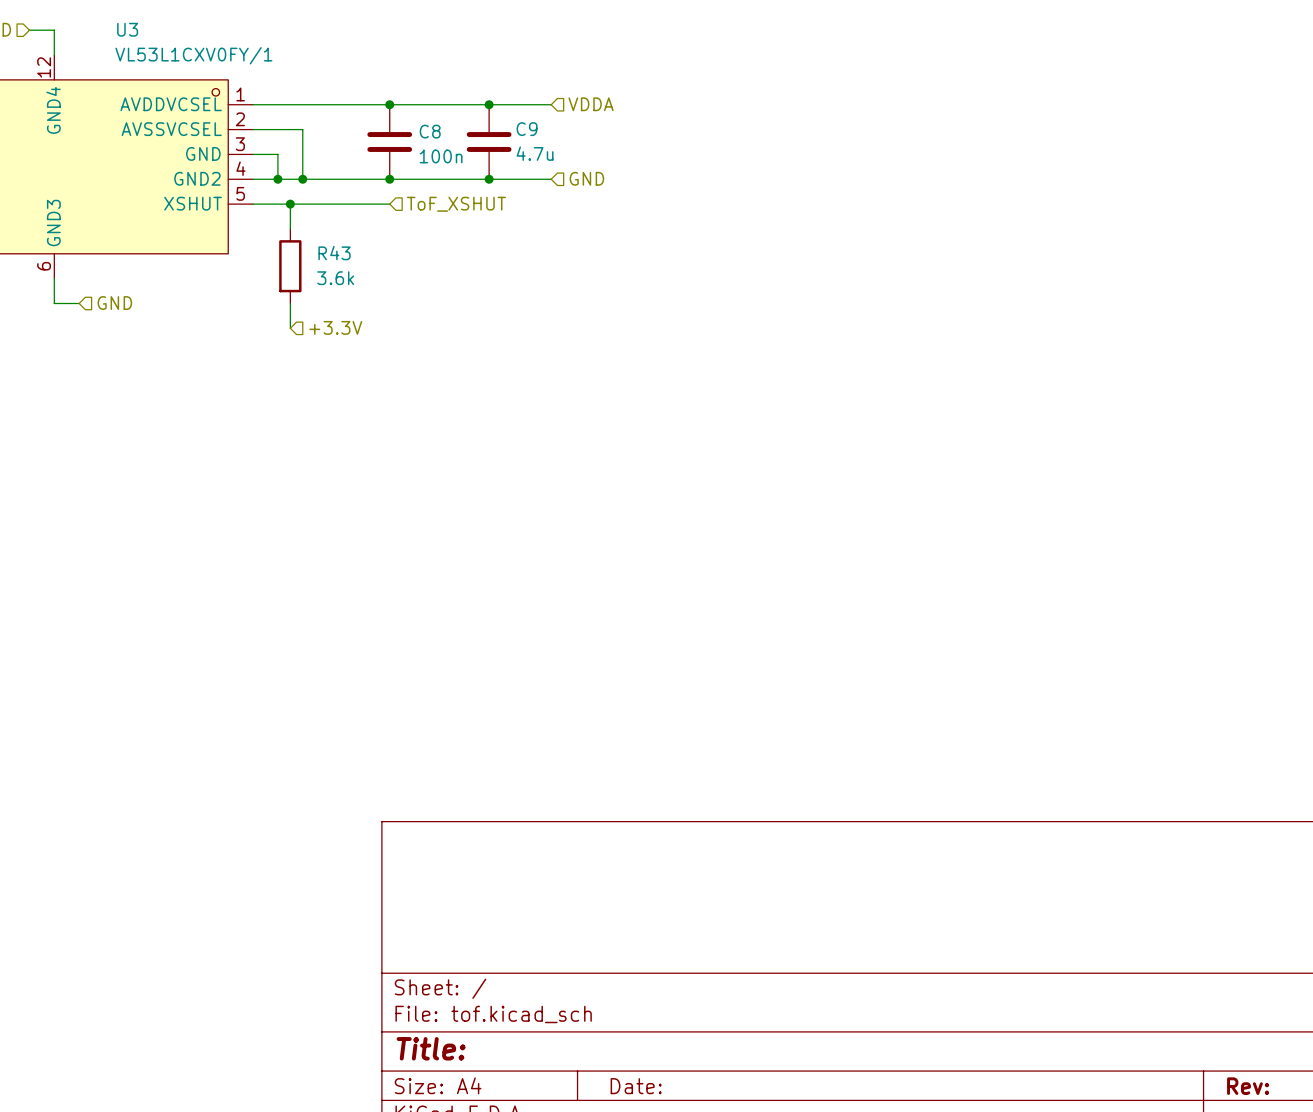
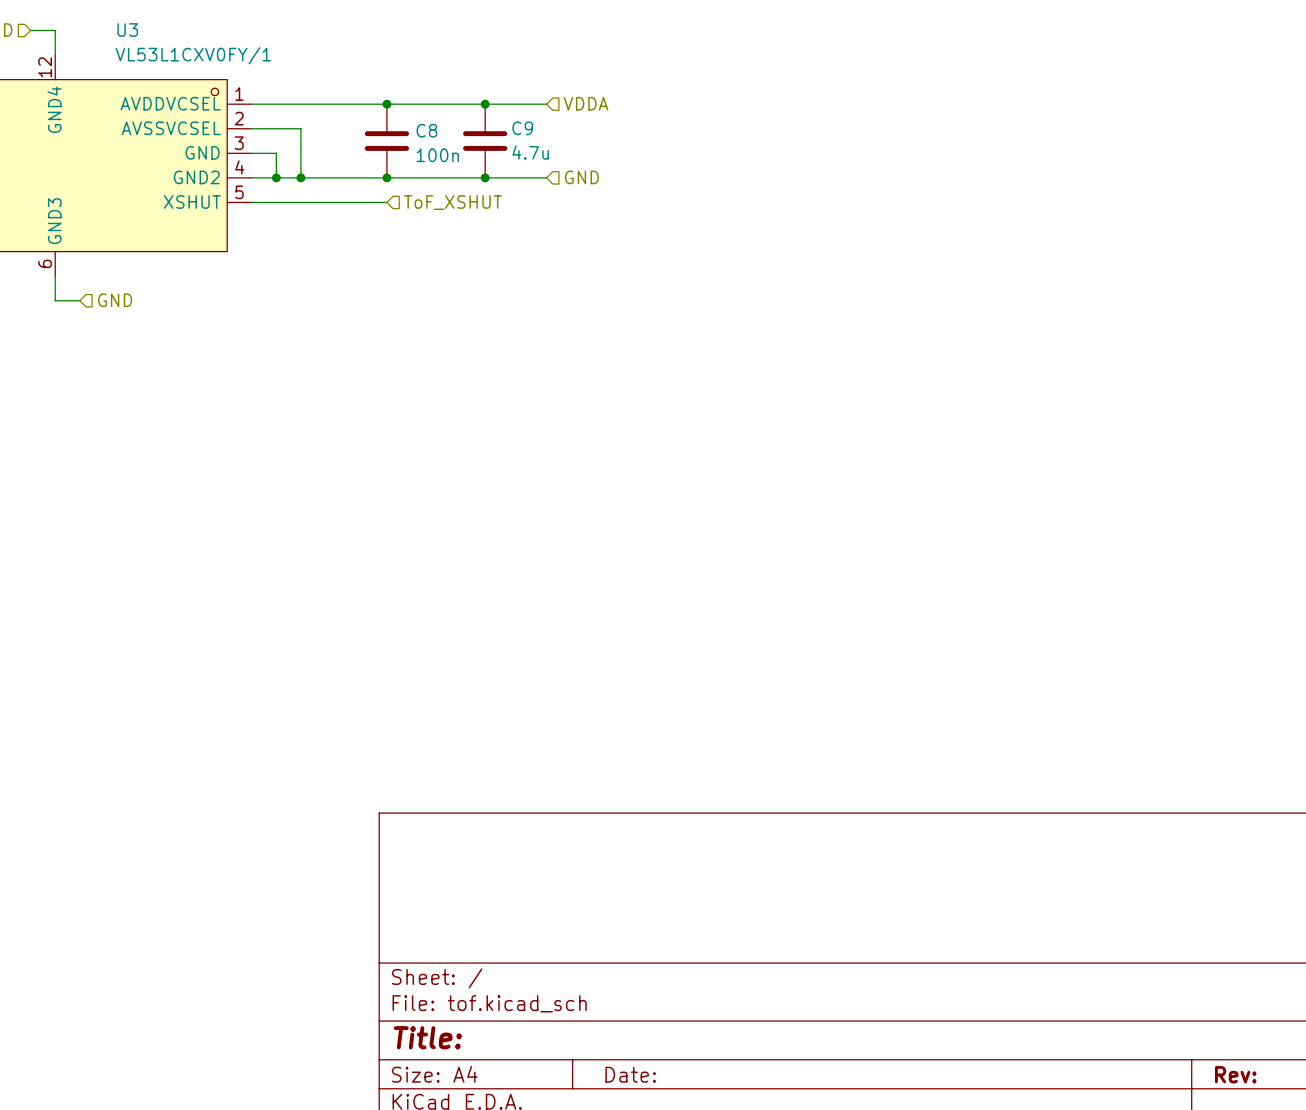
wire: (290, 204) (290, 228) -> none
junction: (290, 204) -> none
R43: 3.6k (290, 266) -> none
wire: (290, 303) (290, 328) -> none
hierarchical label: +3.3V (335, 327) -> none

